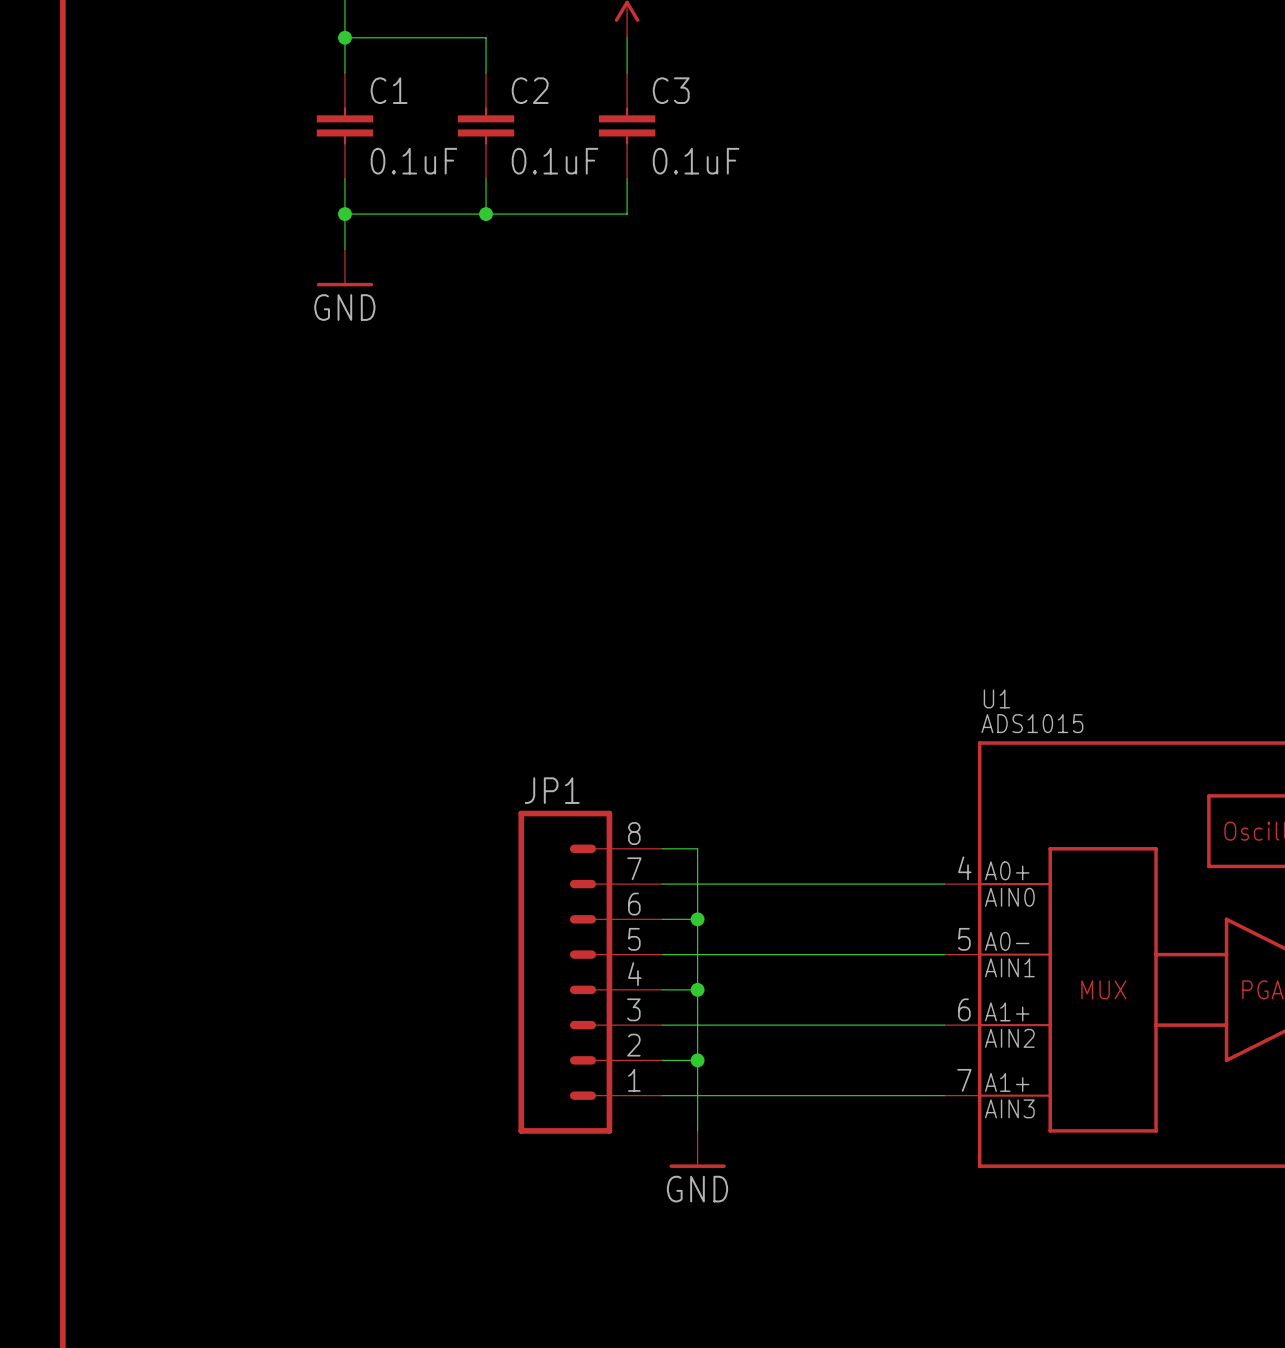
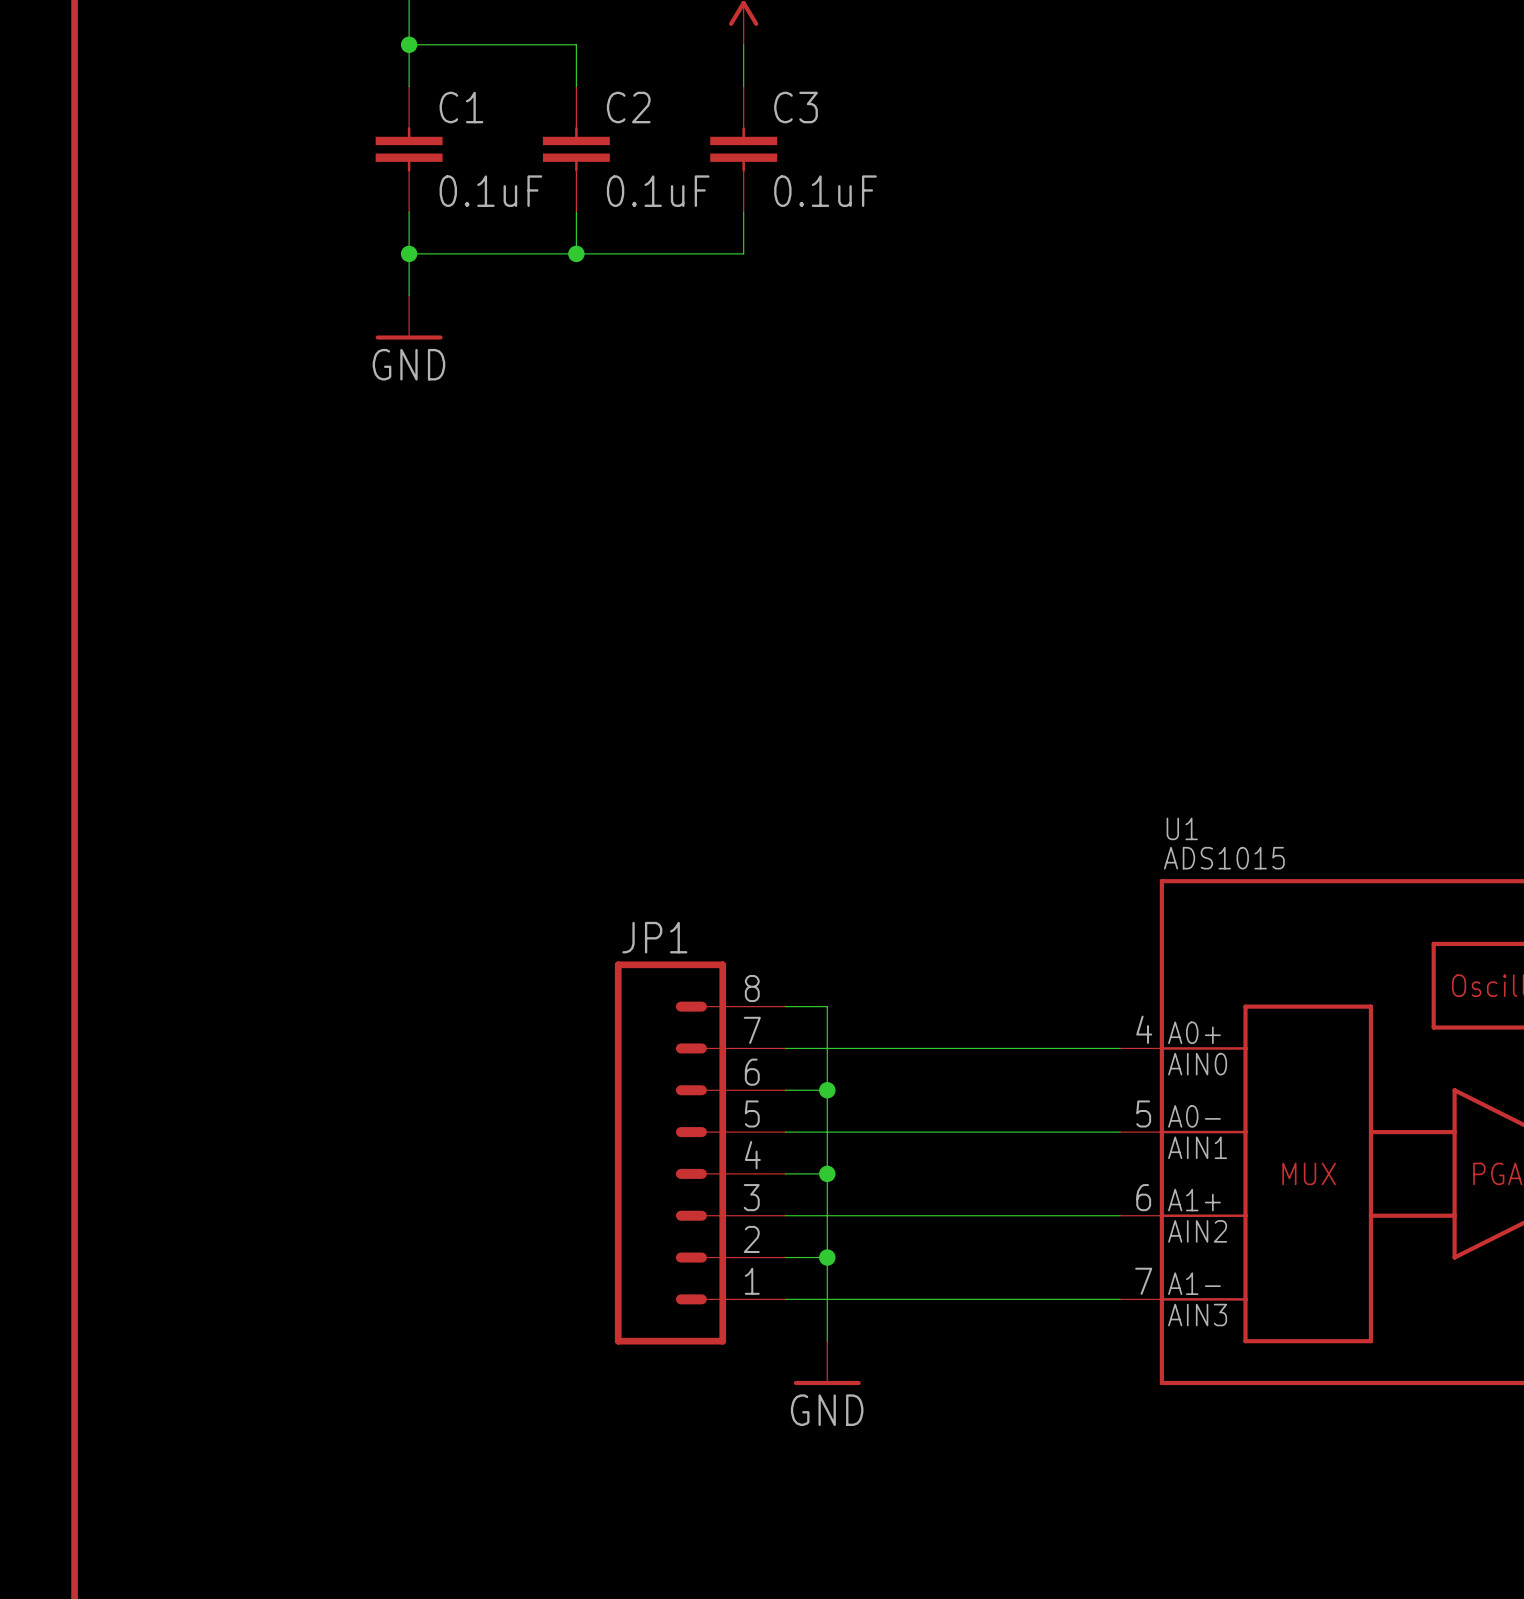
U1 text: A1+ (1007, 1082) -> A1- (1194, 1283)

